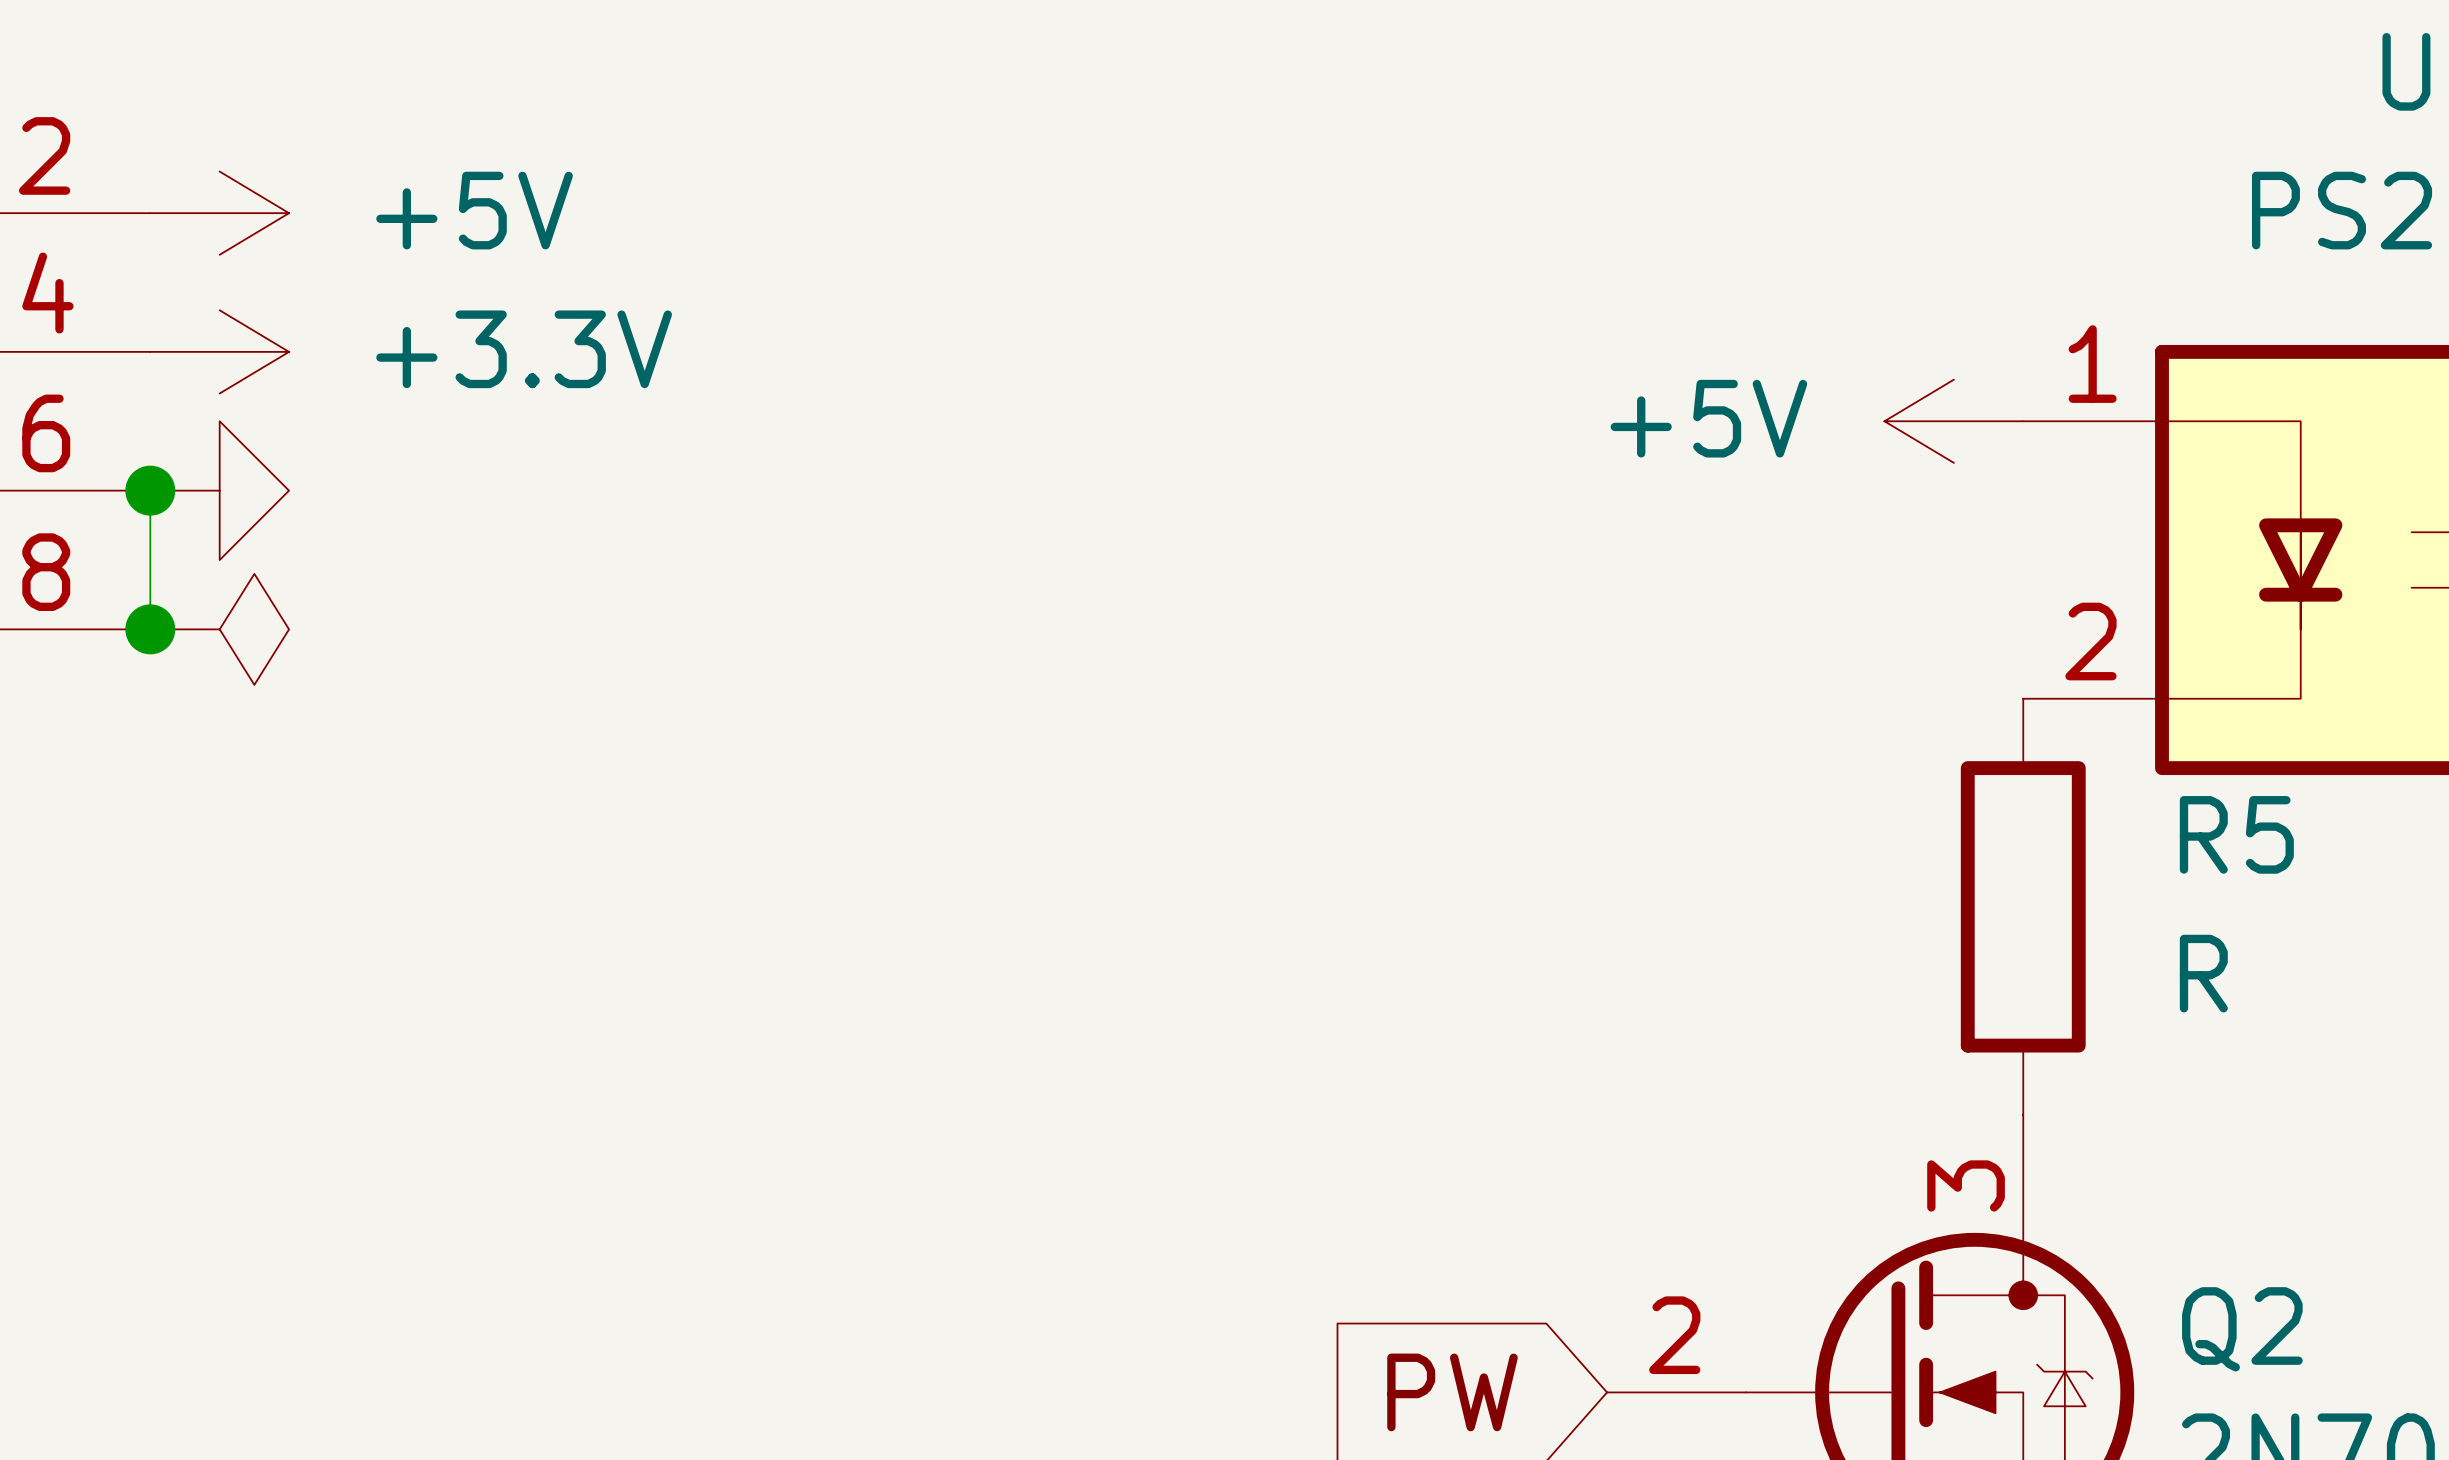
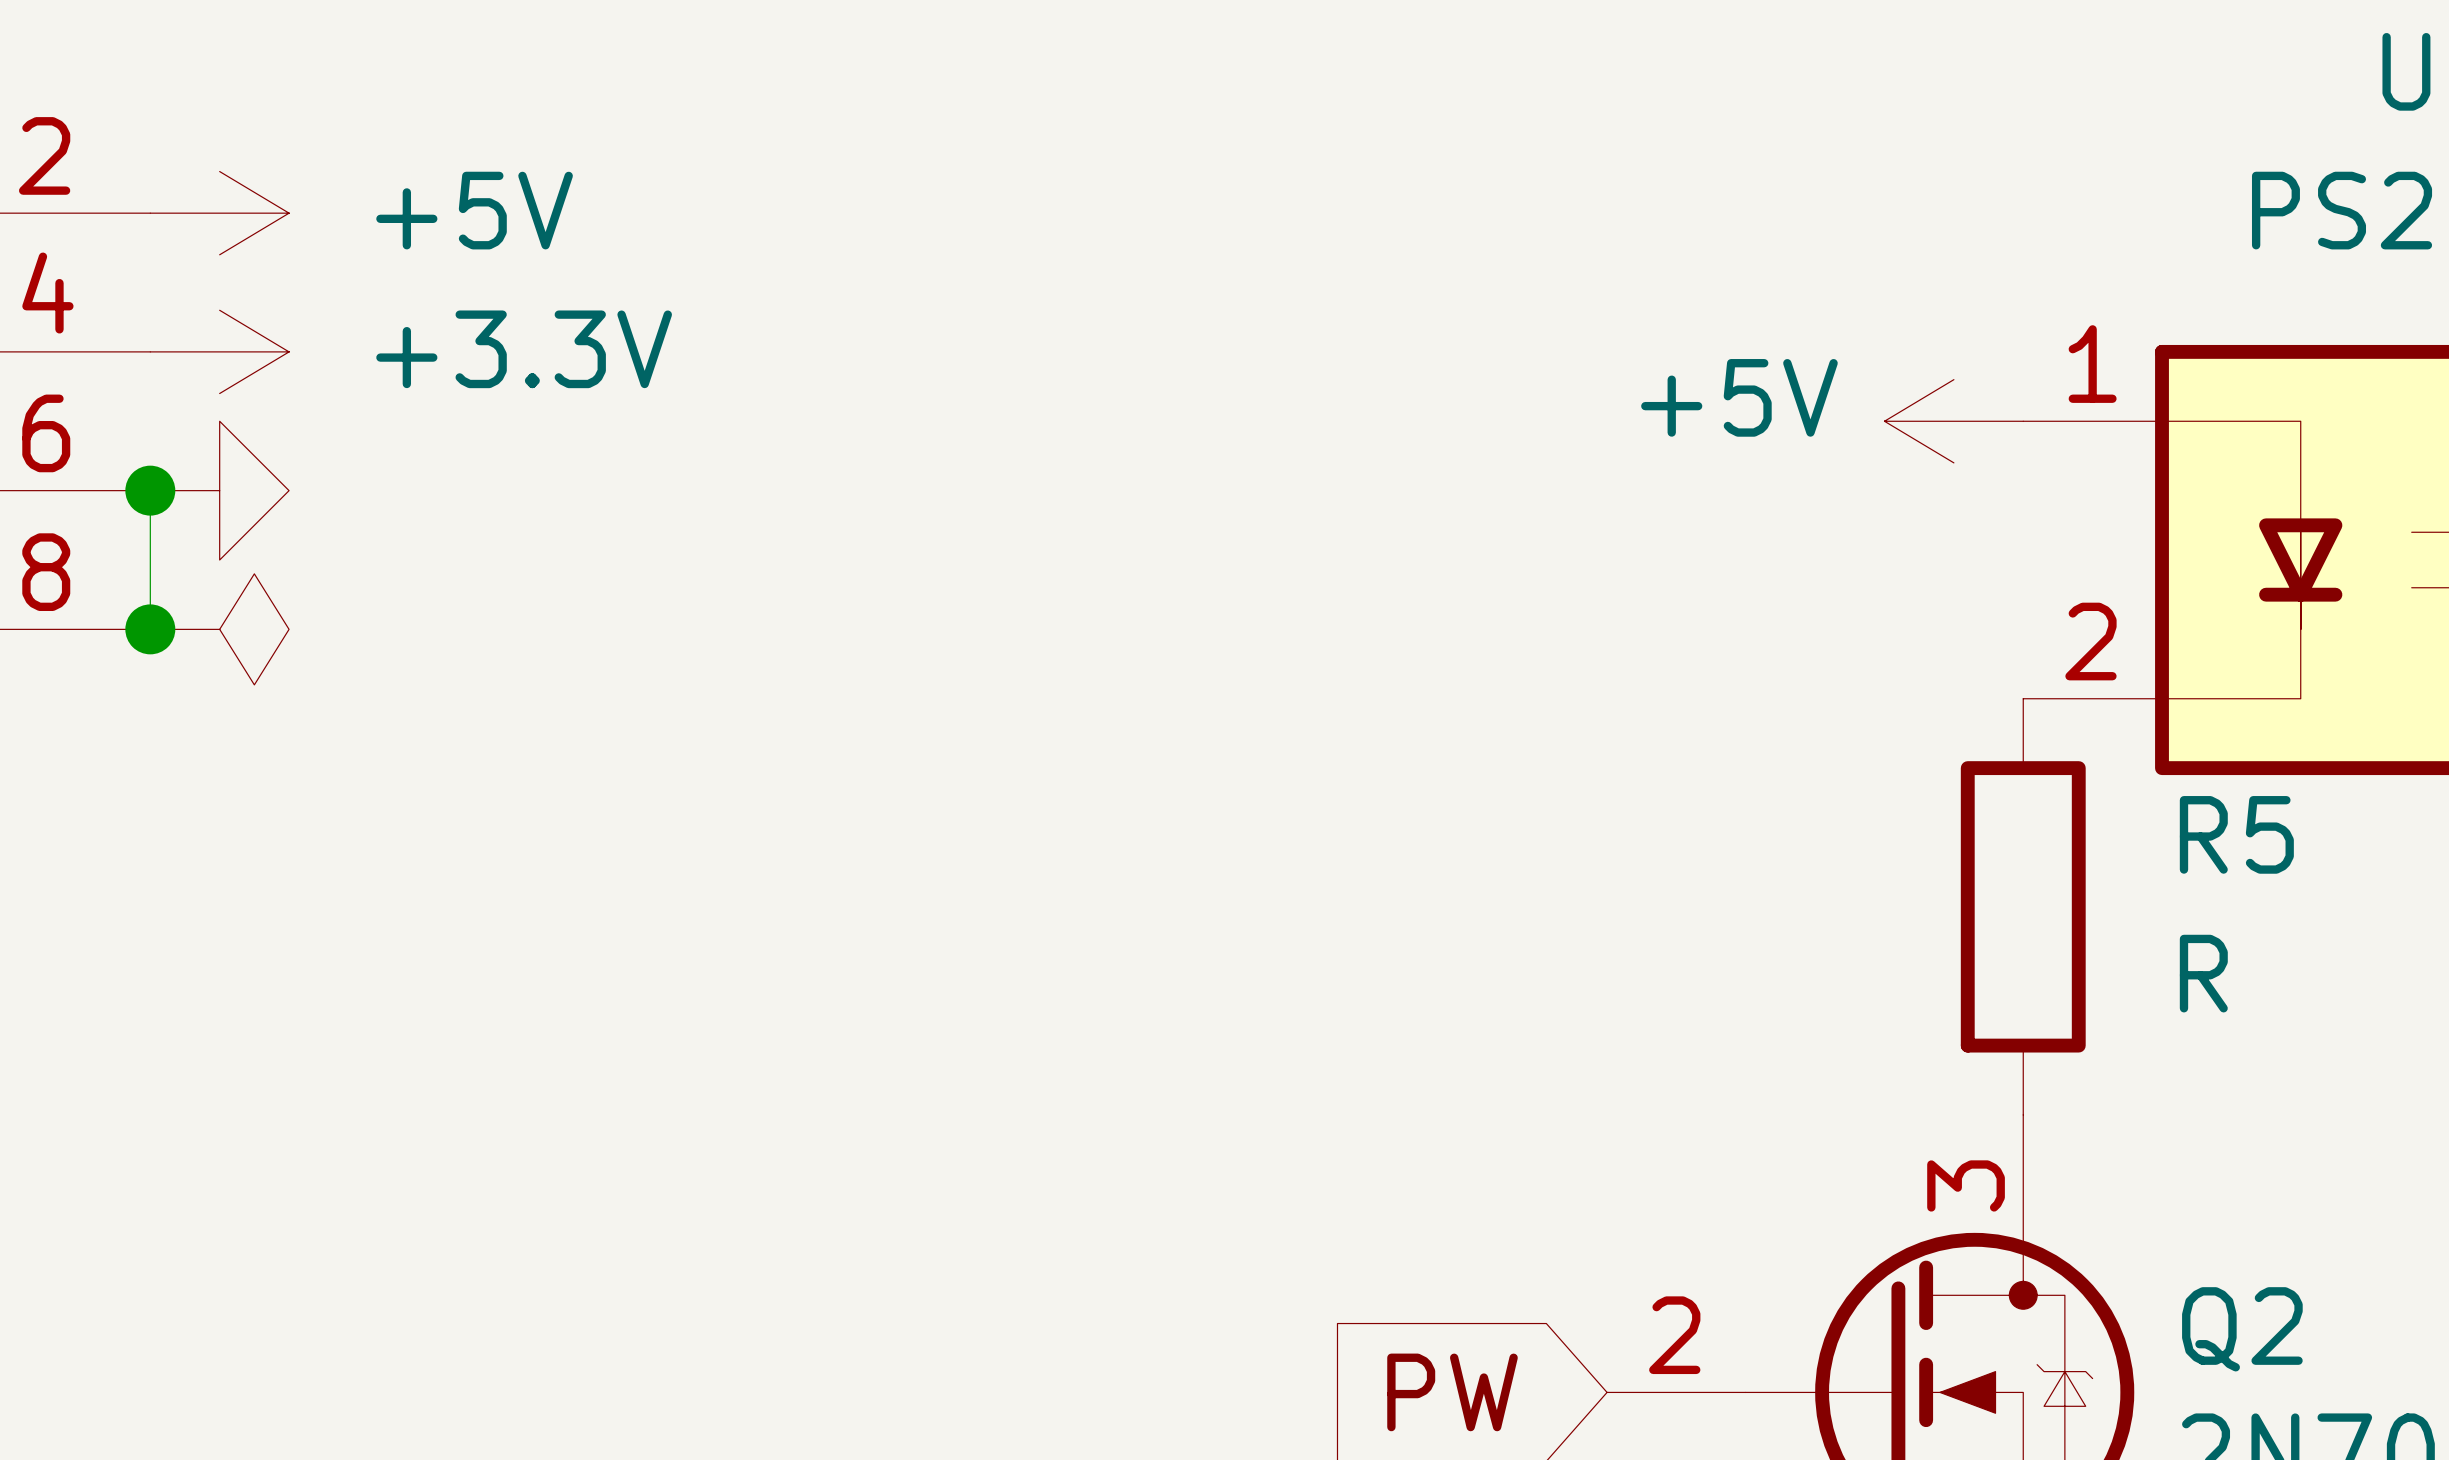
power symbol text position: +5V (1708, 418) -> +5V (1739, 397)

